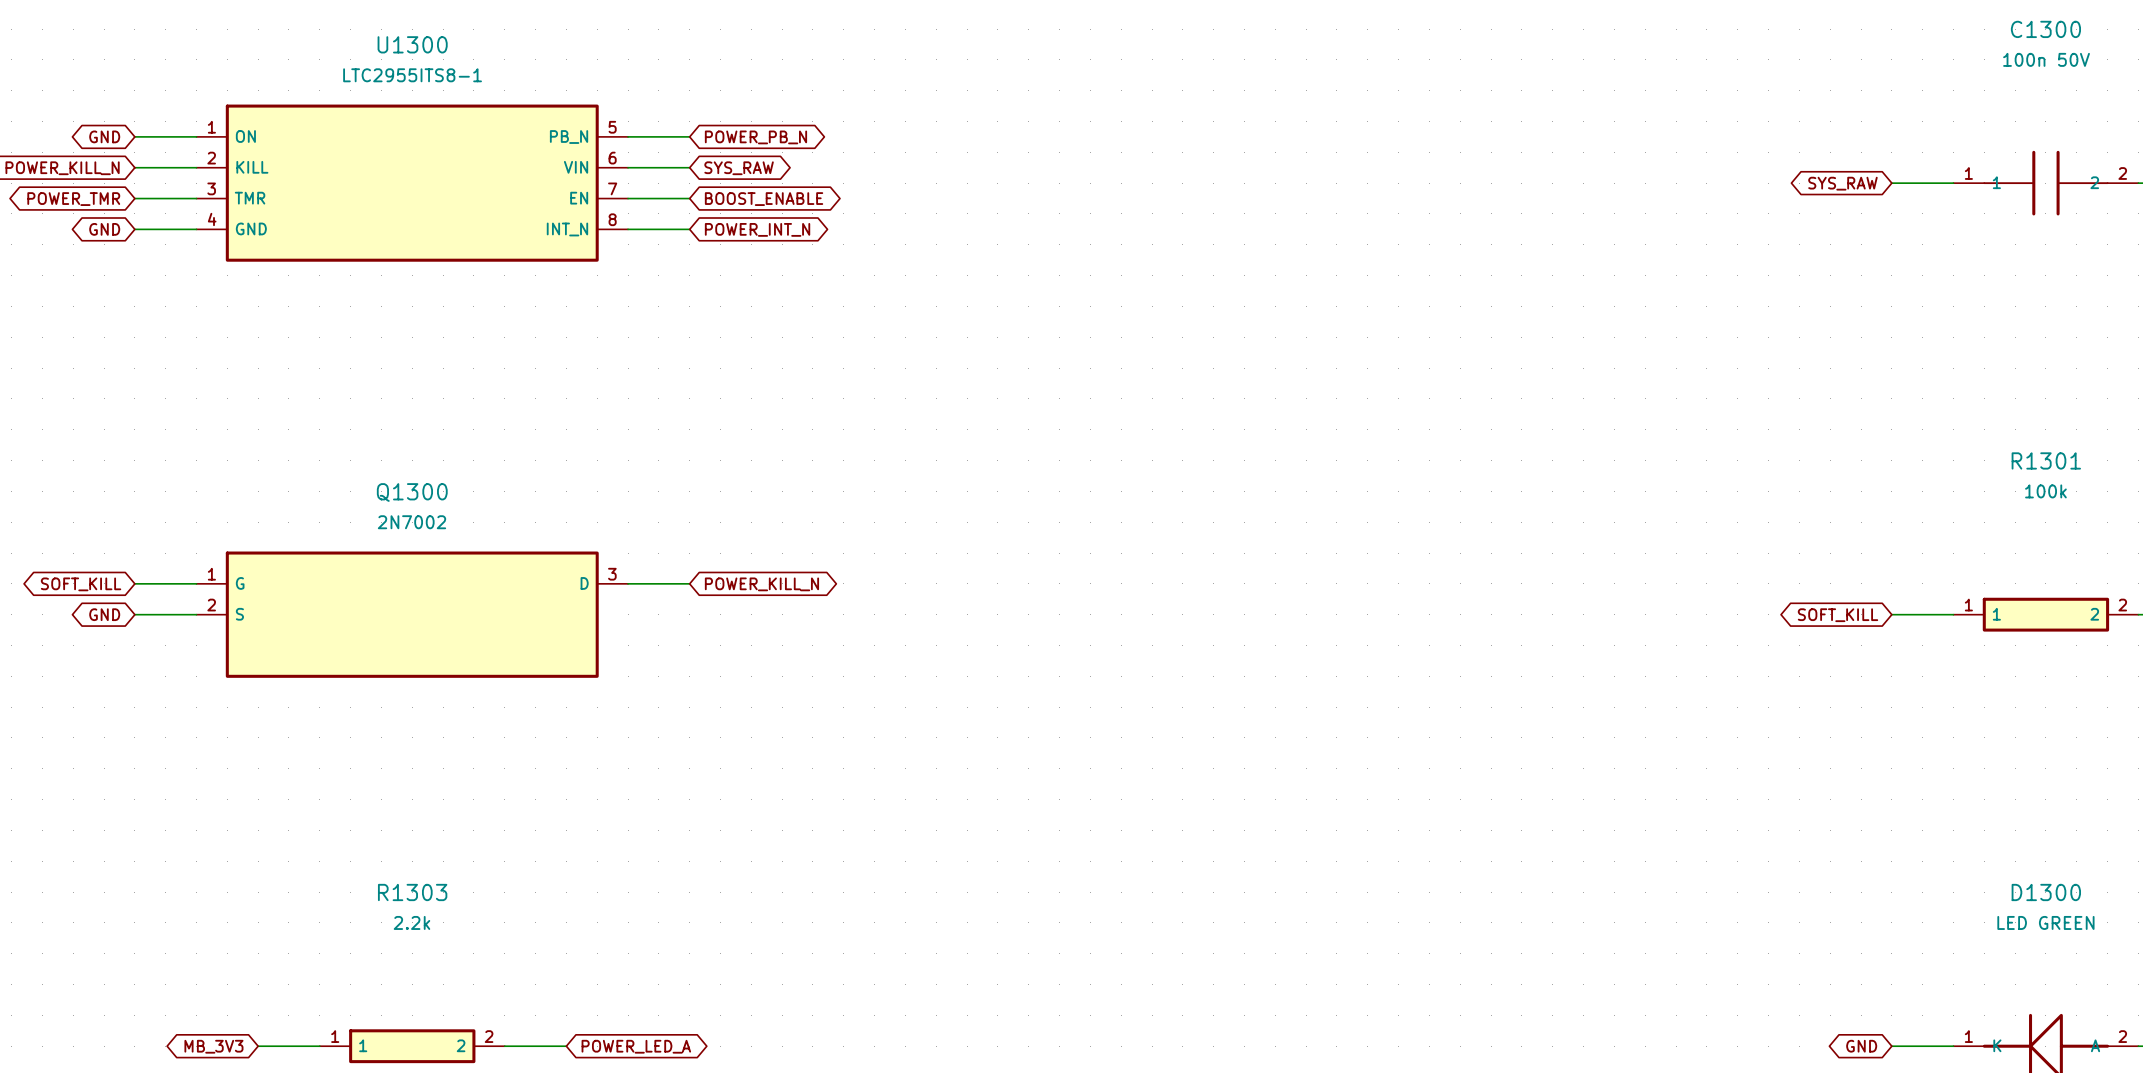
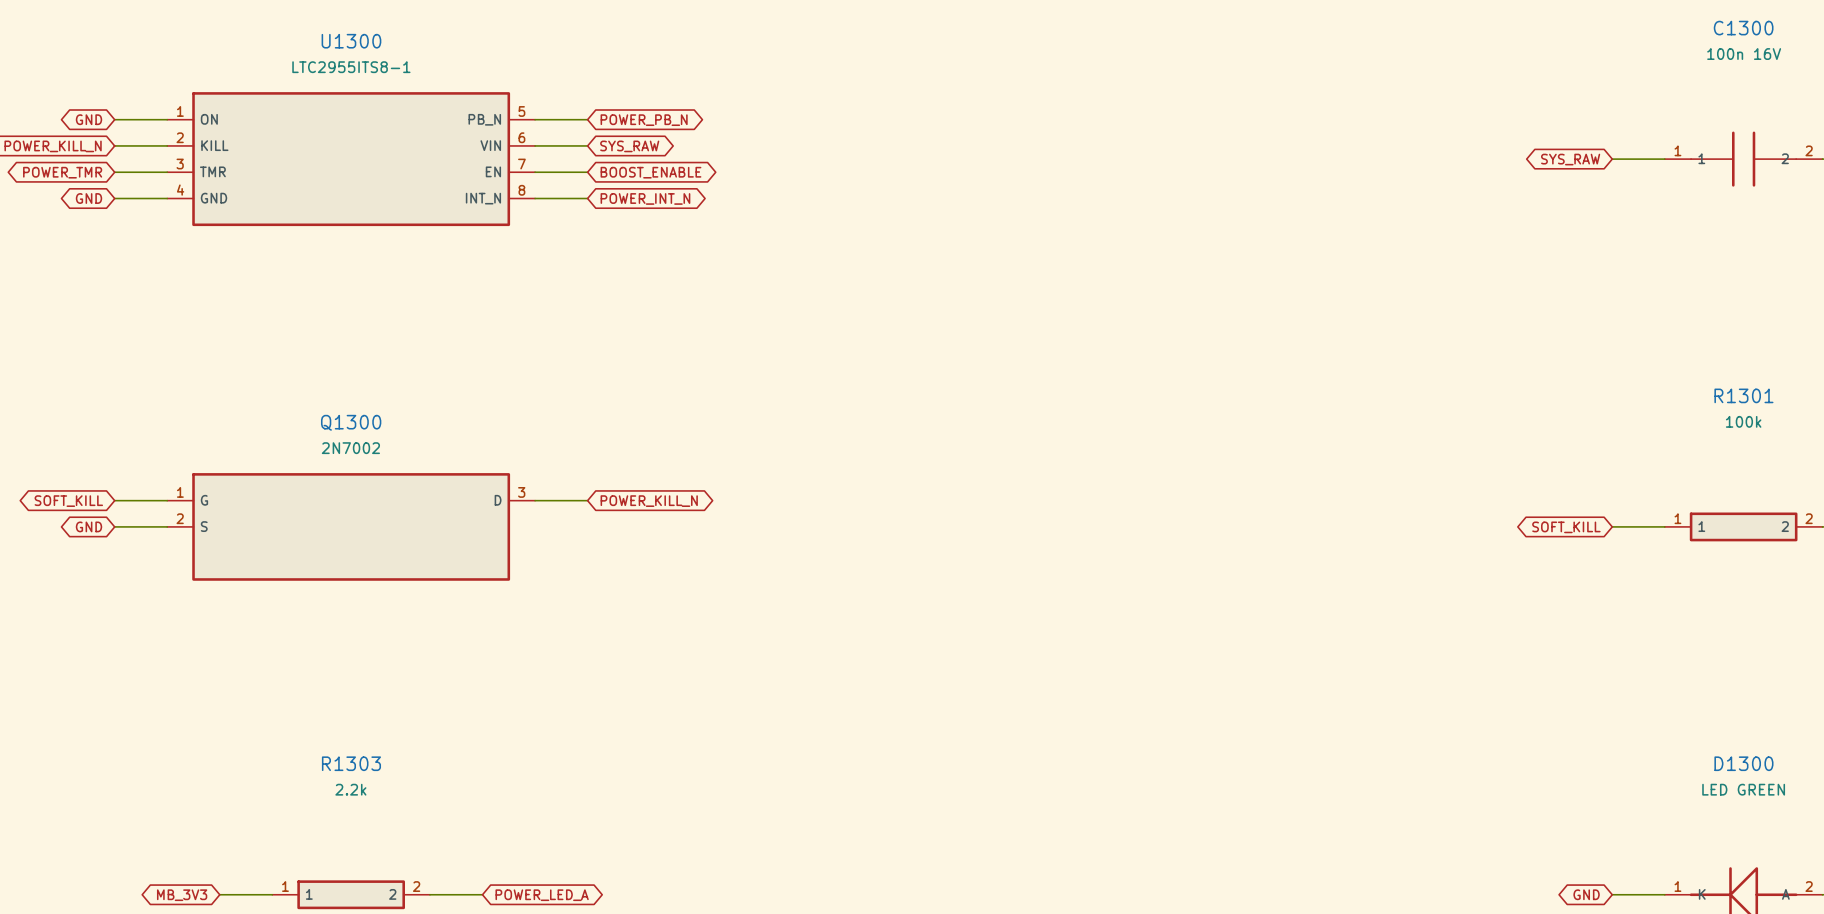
C1300 value: 100n 50V (2046, 59) -> 100n 16V (1744, 54)

